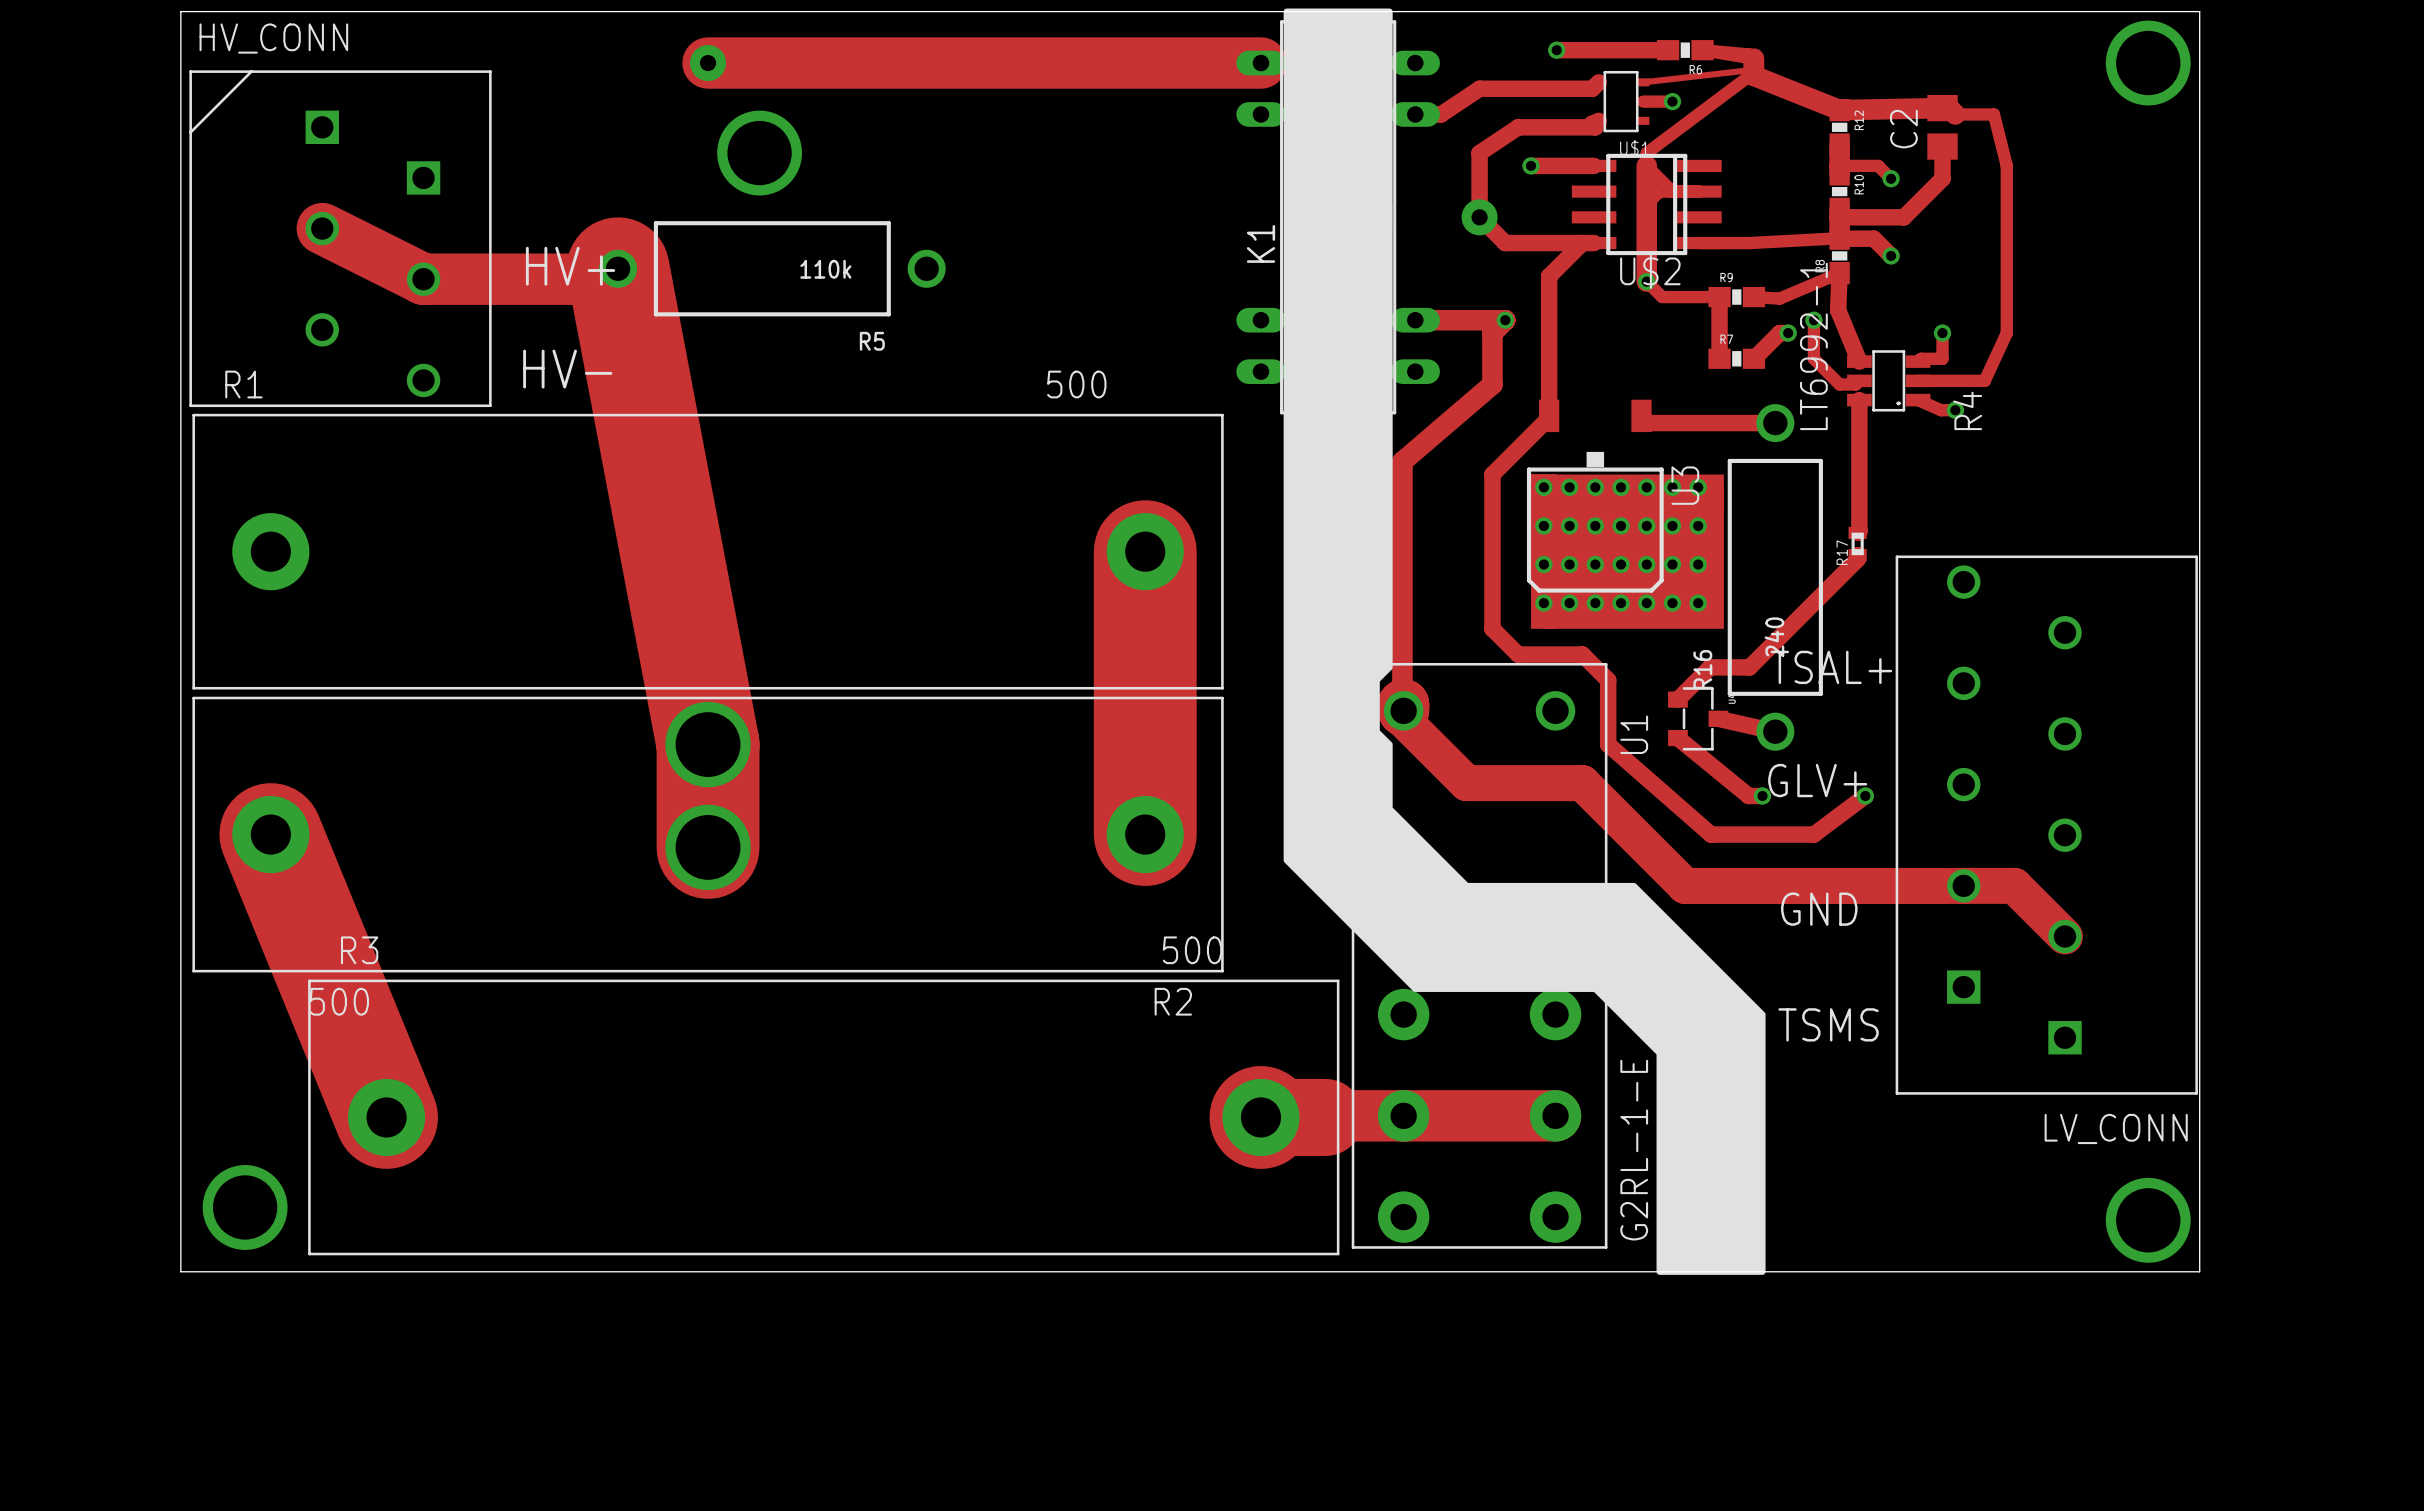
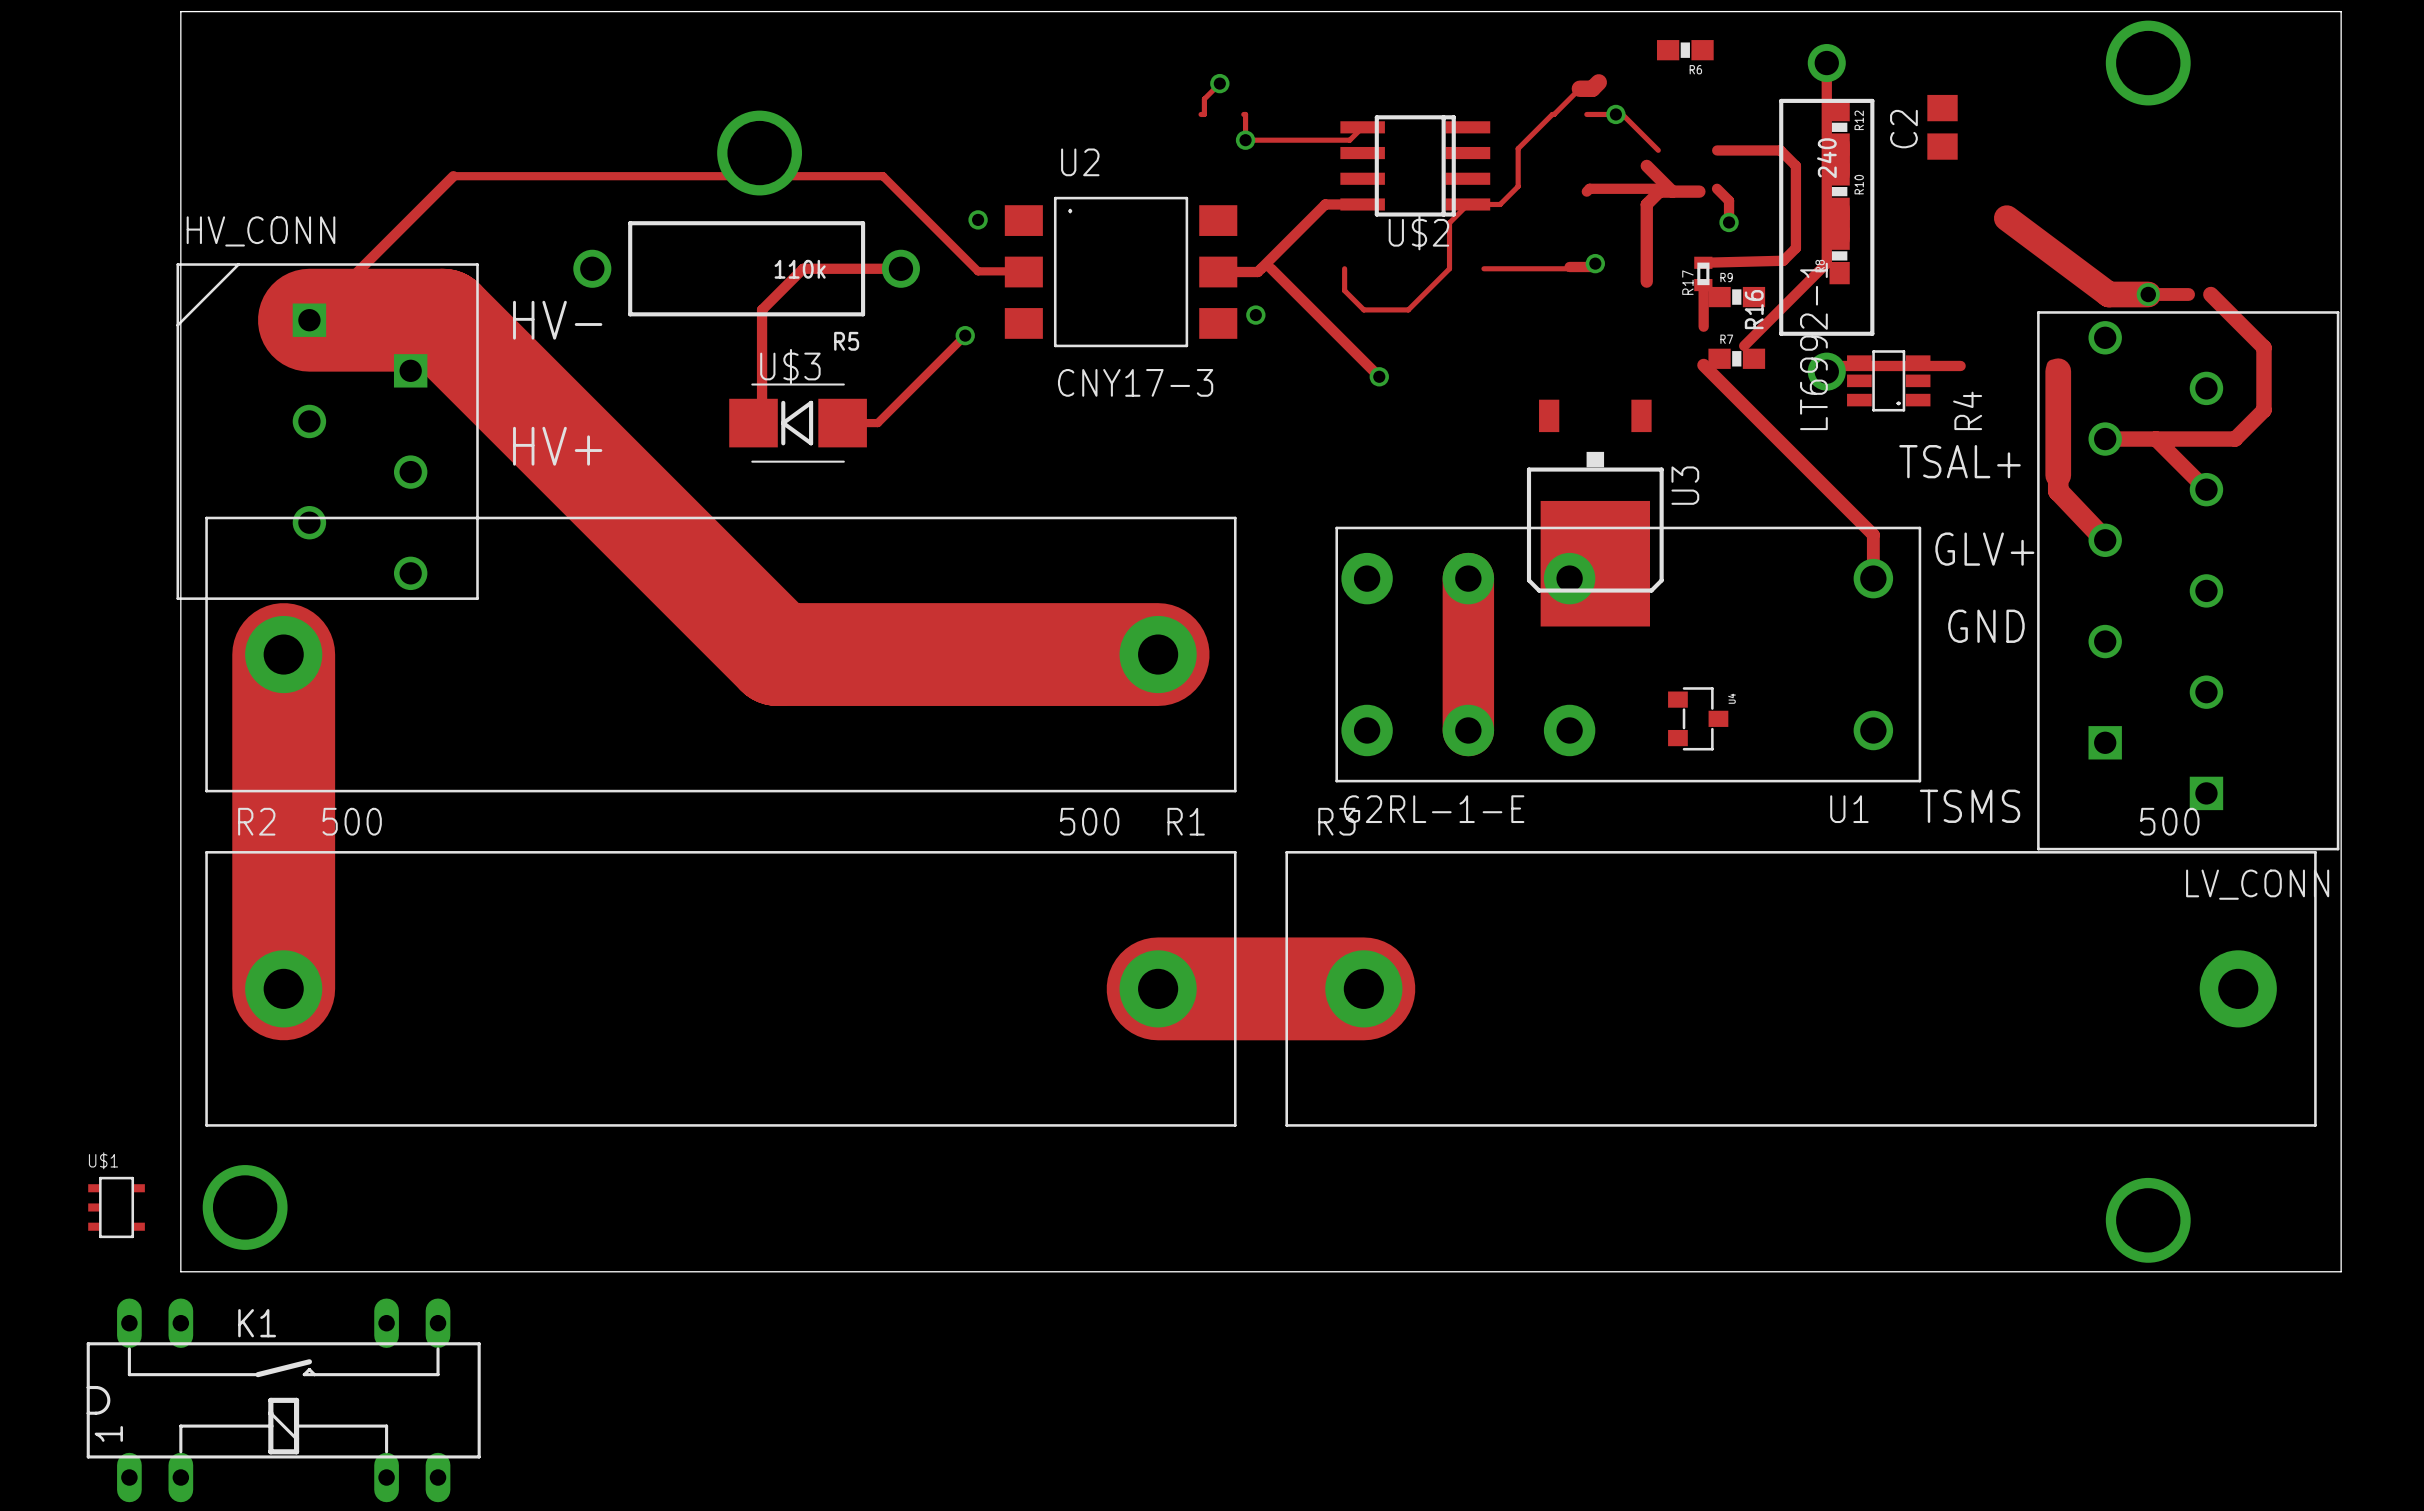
drawing: [1209, 8, 1766, 1275] -> none
board edge: (2199, 11) (2199, 1271) -> (2199, 11) (2341, 11) (2341, 1271) (2199, 1271)
K1 footprint: [1236, 20, 1440, 415] -> [86, 1298, 481, 1503]
track: (1556, 50) (1668, 50) -> none
via: (1556, 50) -> none
track: (1753, 58) (1702, 50) (1749, 54) (1749, 75) -> none
track: (1753, 58) (1753, 75) (1839, 110) (1948, 108) (1955, 114) (1993, 114) (2006, 165) (2006, 333) (1984, 380) (1918, 380) -> none
track: (708, 63) (1260, 63) -> none
via: (708, 63) -> none
track: none -> (1826, 63) (1826, 263) (1744, 345)
track: (1749, 75) (1646, 153) (1646, 281) (1662, 297) (1719, 297) (1719, 358) -> none
track: (1749, 75) (1756, 69) (1643, 82) -> none
track: none -> (1219, 83) (1204, 99) (1204, 114) (1201, 114)
via: none -> (1219, 83)
track: (1579, 88) (1479, 88) (1441, 114) (1415, 114) -> (1579, 88) (1518, 148) (1518, 186) (1500, 204) (1467, 204) (1449, 222) (1449, 268) (1408, 309) (1363, 309) (1344, 290) (1344, 268)
U$1 rotation: 0° (1621, 101) -> 180° (116, 1207)
U$1 position: (1621, 101) -> (116, 1207)
track: (1643, 101) (1672, 101) -> none
via: (1672, 101) -> none
track: none -> (1243, 114) (1245, 114) (1245, 140) (1349, 140) (1362, 127)
track: none -> (1586, 114) (1622, 114) (1658, 150)
via: none -> (1615, 114)
track: (1598, 120) (1591, 123) (1595, 127) (1518, 127) (1479, 153) (1479, 217) (1505, 243) (1594, 243) -> none
via: none -> (1245, 140)
track: (1942, 146) (1942, 178) (1903, 217) (1839, 217) -> none
track: none -> (1717, 150) (1780, 150) (1795, 165) (1795, 248) (1783, 260) (1703, 262)
track: (1531, 165) (1594, 165) -> none
via: (1531, 165) -> none
track: (1839, 165) (1878, 165) (1891, 178) -> none
via: (1891, 178) -> none
track: none -> (1658, 188) (1589, 188) (1586, 191)
track: none -> (1717, 188) (1729, 200) (1729, 222)
track: none -> (1362, 204) (1325, 204) (1257, 272) (1218, 272)
U$2 position: (1646, 204) -> (1415, 165)
via: (1479, 217) -> none
track: none -> (2006, 218) (2108, 294) (2188, 294)
via: none -> (978, 219)
via: none -> (1729, 222)
track: (322, 228) (423, 279) (620, 279) (618, 268) (708, 744) (708, 847) -> none
HV_CONN position: (340, 238) -> (327, 431)
K1 name position: K1 (1260, 243) -> K1 (257, 1323)
track: (1582, 243) (1549, 276) (1549, 417) (1492, 474) (1492, 628) (1518, 654) (1582, 654) (1608, 680) (1608, 744) (1711, 834) (1813, 834) (1865, 795) -> none
track: (1699, 243) (1873, 238) (1891, 255) -> none
via: (1891, 255) -> none
track: none -> (1595, 263) (1595, 266) (1569, 266) (1567, 268) (1483, 268)
via: none -> (1595, 263)
text position: HV+ (570, 266) -> HV+ (557, 446)
R5 position: (772, 268) -> (746, 268)
track: none -> (911, 268) (803, 268) (762, 309) (762, 414) (753, 423)
track: none -> (1260, 268) (1271, 268) (1379, 376)
track: none -> (1023, 272) (978, 271) (882, 176) (453, 176) (309, 320)
U2: none -> (1121, 272)
via: (1646, 281) -> none
track: none -> (1703, 285) (1703, 326)
via: none -> (2148, 294)
track: none -> (2210, 294) (2263, 347) (2263, 410) (2235, 439) (2105, 439)
track: (1753, 297) (1779, 298) (1839, 273) (1838, 310) (1859, 361) -> none
via: none -> (1255, 315)
track: none -> (309, 320) (443, 320) (777, 654) (1158, 654)
track: (1415, 320) (1505, 320) (1492, 333) (1492, 384) (1402, 461) (1403, 720) (1466, 783) (1582, 783) (1685, 886) (2014, 885) (2065, 936) -> none
via: (1505, 320) -> none
track: (1813, 320) (1813, 358) (1839, 384) (1855, 384) (1859, 380) -> none
via: (1813, 320) -> none
track: (1788, 333) (1779, 333) (1753, 358) -> none
via: (1788, 333) -> none
track: (1942, 333) (1942, 358) (1920, 358) (1918, 361) -> none
via: (1942, 333) -> none
track: none -> (965, 335) (877, 423) (842, 423)
via: none -> (965, 335)
track: none -> (1703, 365) (1873, 534) (1873, 578)
track: none -> (1960, 365) (1832, 365) (1826, 371)
track: none -> (2052, 365) (2058, 371) (2058, 490) (2105, 540)
text position: HV- (567, 369) -> HV- (557, 320)
via: none -> (1379, 376)
R1 name position: R1 (243, 384) -> R1 (1186, 821)
R1 value position: 500 (1076, 384) -> 500 (352, 821)
track: (1859, 400) (1859, 531) (1857, 532) -> none
track: (1918, 400) (1941, 410) (1955, 410) -> none
via: (1955, 410) -> none
track: (1641, 415) (1648, 423) (1775, 423) -> none
U$3: none -> (798, 423)
track: none -> (2155, 439) (2206, 489)
via: (1543, 487) -> none
via: (1569, 487) -> none
via: (1595, 487) -> none
via: (1621, 487) -> none
via: (1646, 487) -> none
via: (1672, 487) -> none
via: (1698, 487) -> none
via: (1543, 525) -> none
via: (1569, 525) -> none
via: (1595, 525) -> none
via: (1621, 525) -> none
via: (1646, 525) -> none
via: (1672, 525) -> none
via: (1698, 525) -> none
R17 position: (1857, 543) -> (1703, 273)
R1 position: (708, 551) -> (720, 654)
track: (1145, 551) (1145, 834) -> none
track: (1857, 555) (1857, 559) (1749, 667) (1710, 667) (1677, 699) -> none
via: (1543, 564) -> none
via: (1569, 564) -> none
via: (1595, 564) -> none
via: (1621, 564) -> none
via: (1646, 564) -> none
via: (1672, 564) -> none
via: (1698, 564) -> none
R16 position: (1775, 577) -> (1826, 217)
track: none -> (1468, 578) (1468, 730)
via: (1543, 603) -> none
via: (1569, 603) -> none
via: (1595, 603) -> none
via: (1621, 603) -> none
via: (1646, 603) -> none
via: (1672, 603) -> none
via: (1698, 603) -> none
R16 value position: 240 (1774, 637) -> 240 (1826, 158)
track: none -> (283, 654) (283, 988)
text position: TSAL+ (1831, 667) -> TSAL+ (1960, 461)
track: (1718, 718) (1775, 731) -> none
track: (1677, 738) (1748, 795) (1762, 795) -> none
via: (708, 744) -> none
text position: GLV+ (1817, 780) -> GLV+ (1984, 549)
via: (1762, 795) -> none
via: (1865, 795) -> none
LV_CONN position: (2046, 825) -> (2188, 580)
track: (270, 834) (386, 1117) -> none
R2 position: (708, 834) -> (720, 988)
via: (708, 847) -> none
text position: GND (1819, 909) -> GND (1986, 626)
U1 rotation: 0° (1479, 955) -> 90° clockwise (1628, 654)
track: none -> (1158, 988) (1363, 988)
R2 value position: 500 (339, 1001) -> 500 (1089, 821)
R2 name position: R2 (1173, 1001) -> R2 (256, 821)
text position: TSMS (1828, 1024) -> TSMS (1970, 806)
track: (1555, 1115) (1260, 1117) -> none
R3 position: (823, 1117) -> (1801, 988)

